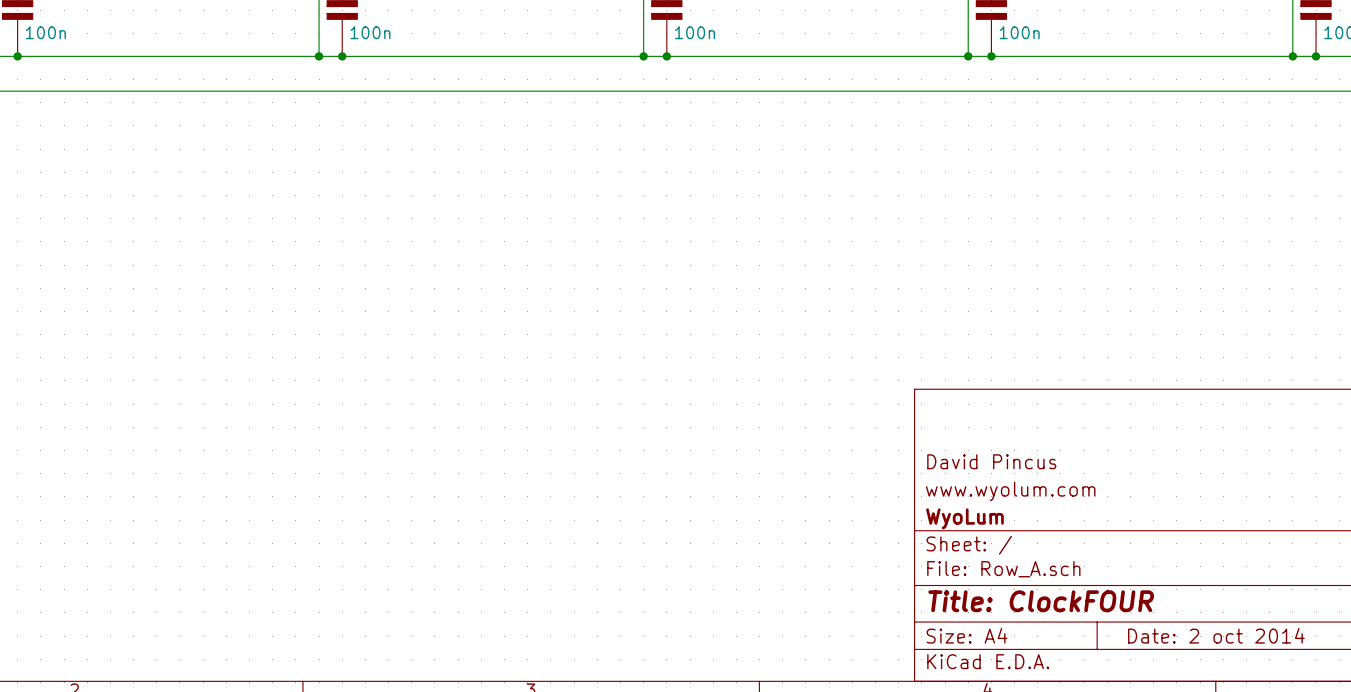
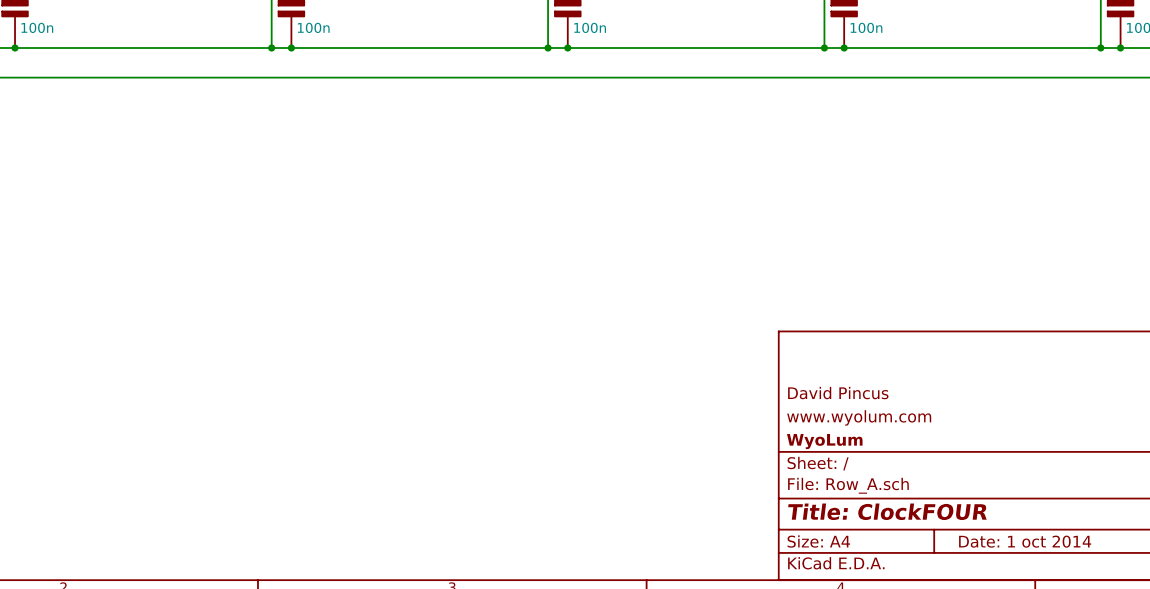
title block: Date: 2 oct 2014 (1216, 635) -> Date: 1 oct 2014 (1025, 541)

